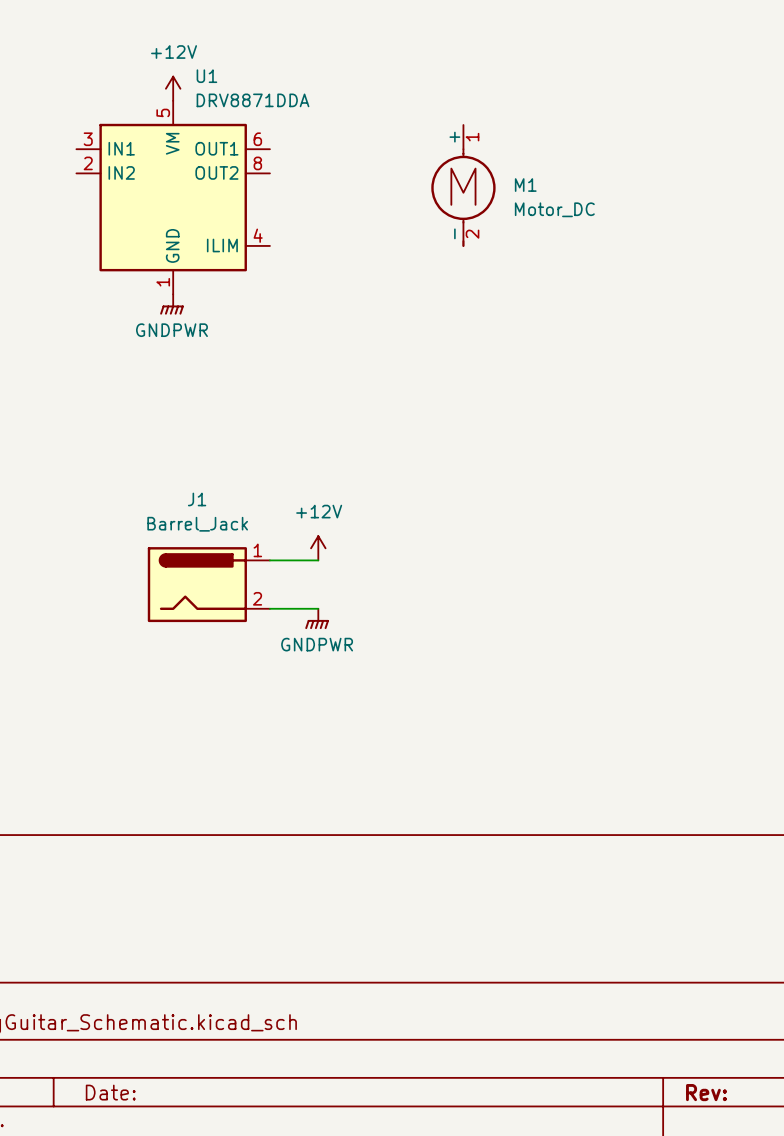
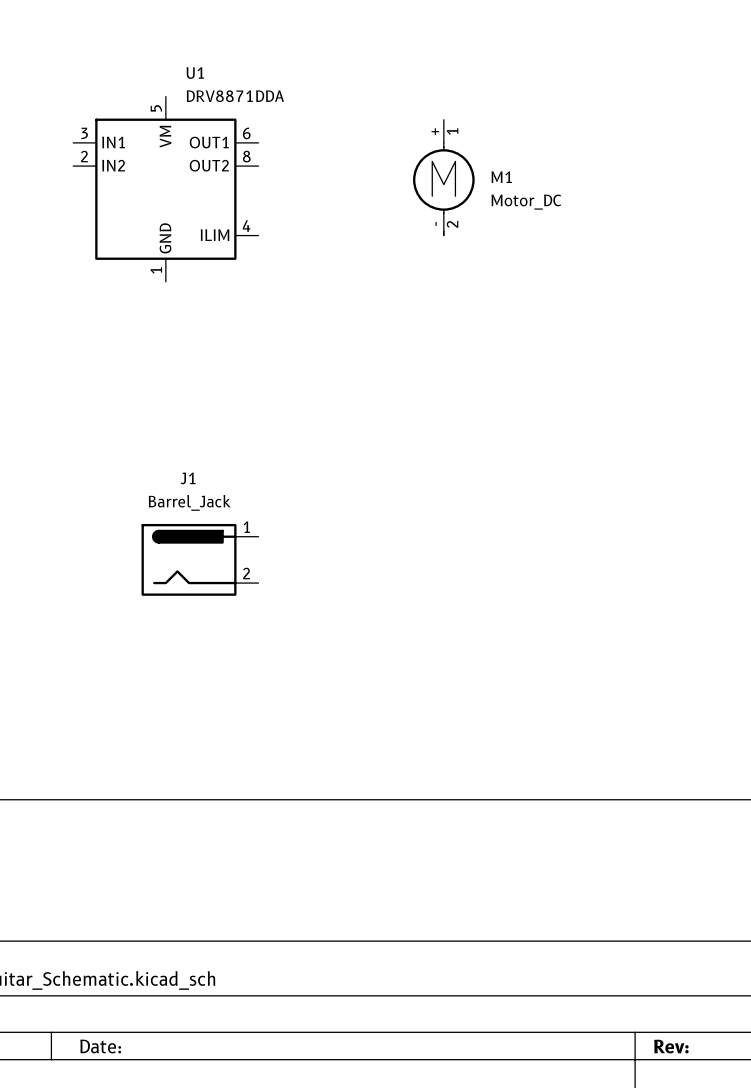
power symbol: +12V (173, 88) -> none
power symbol: GNDPWR (171, 304) -> none
power symbol: +12V (318, 548) -> none
wire: (269, 560) (318, 560) -> none
wire: (269, 608) (318, 608) -> none
power symbol: GNDPWR (317, 618) -> none

